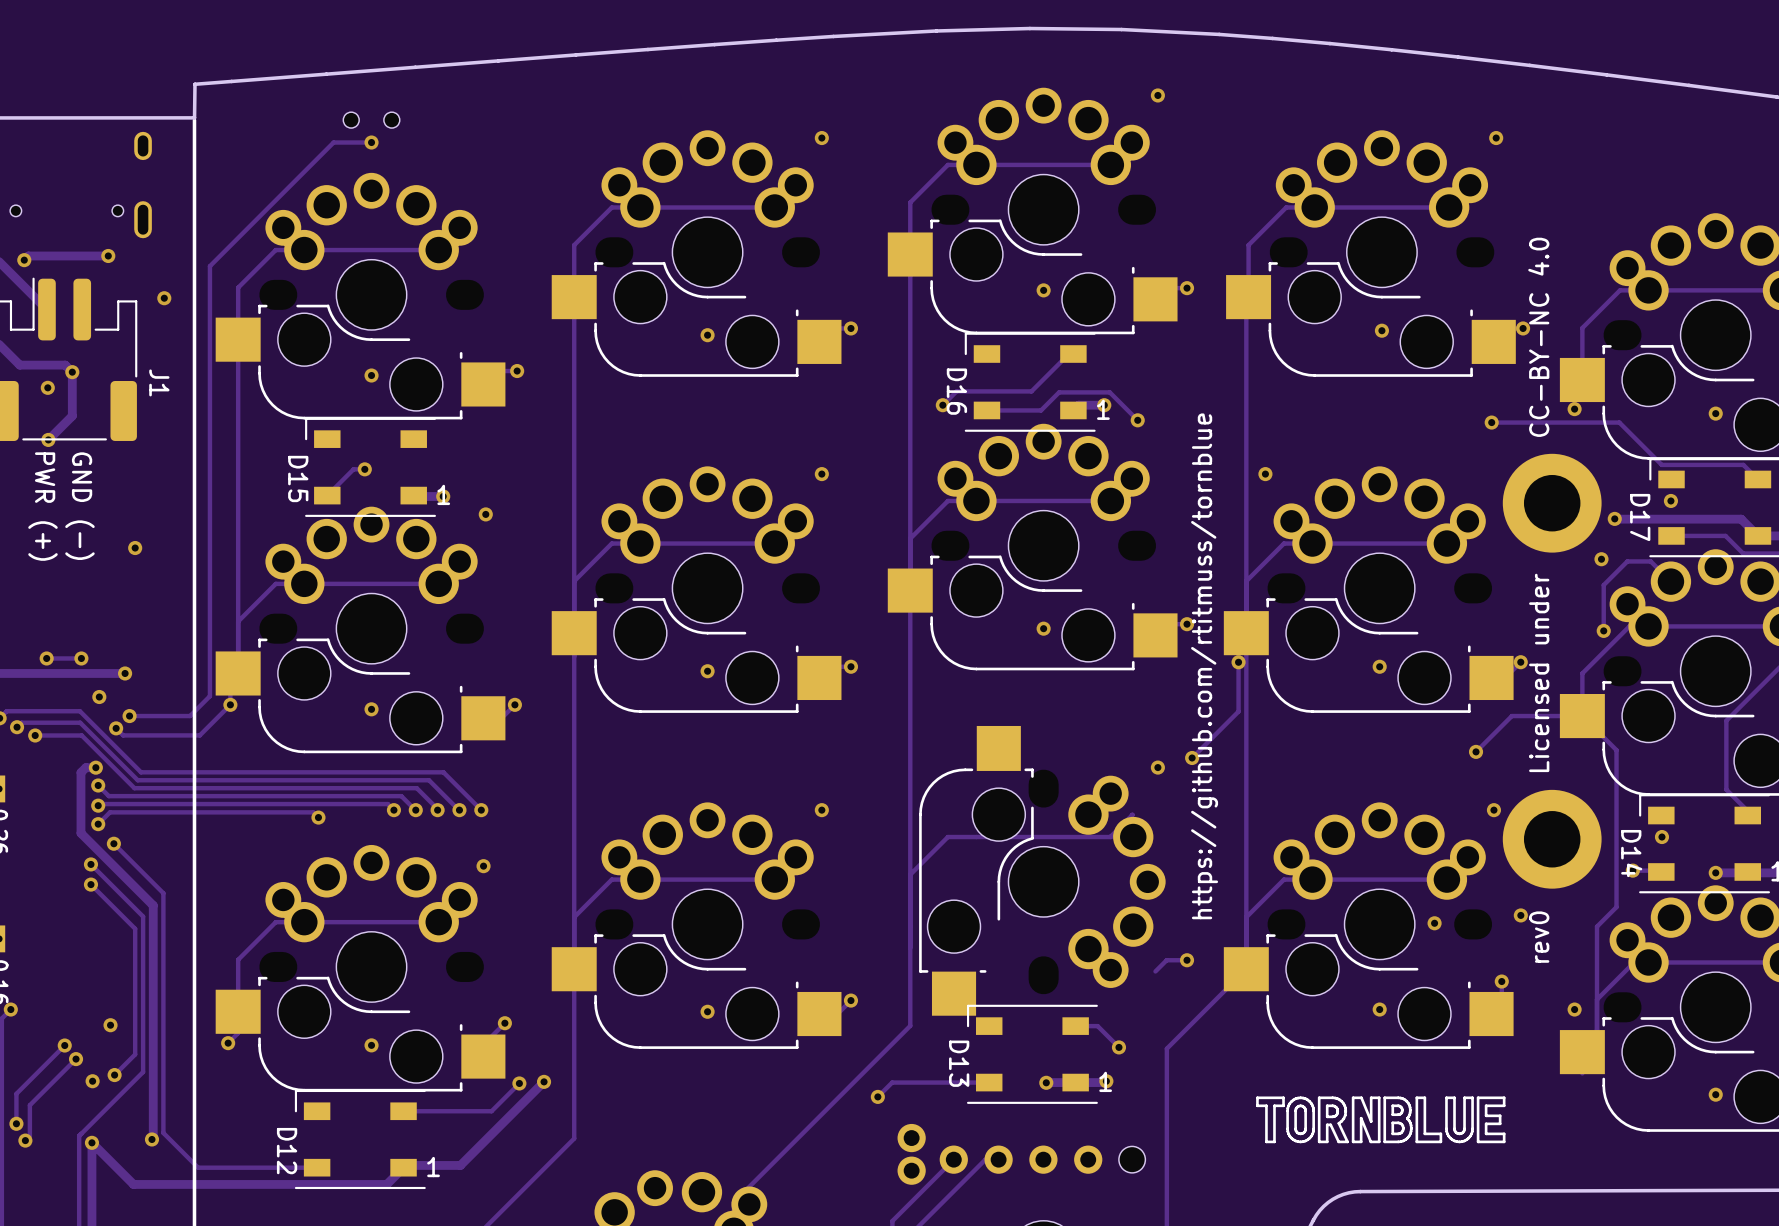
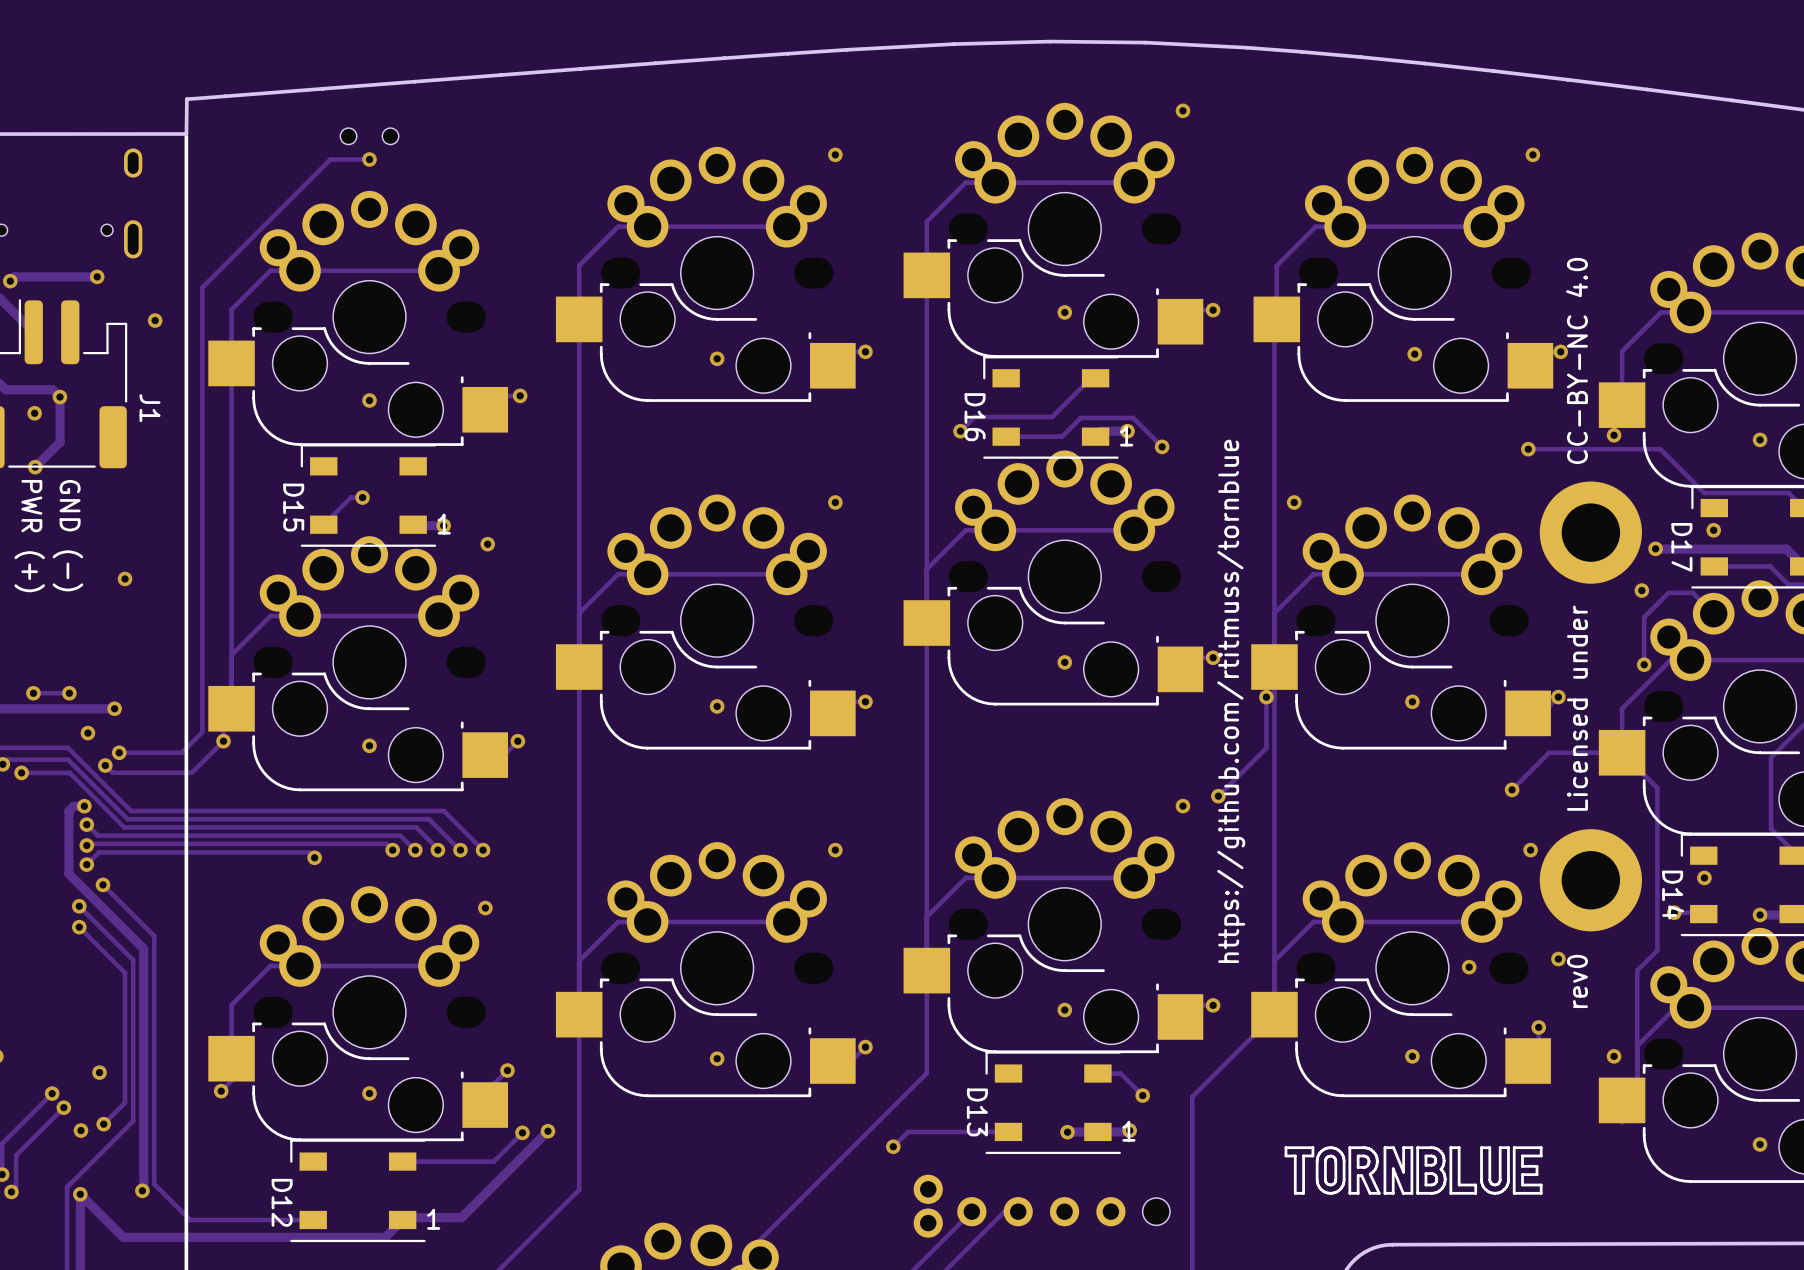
part rotation: 0° (1042, 870) -> 90° counterclockwise (1053, 925)

